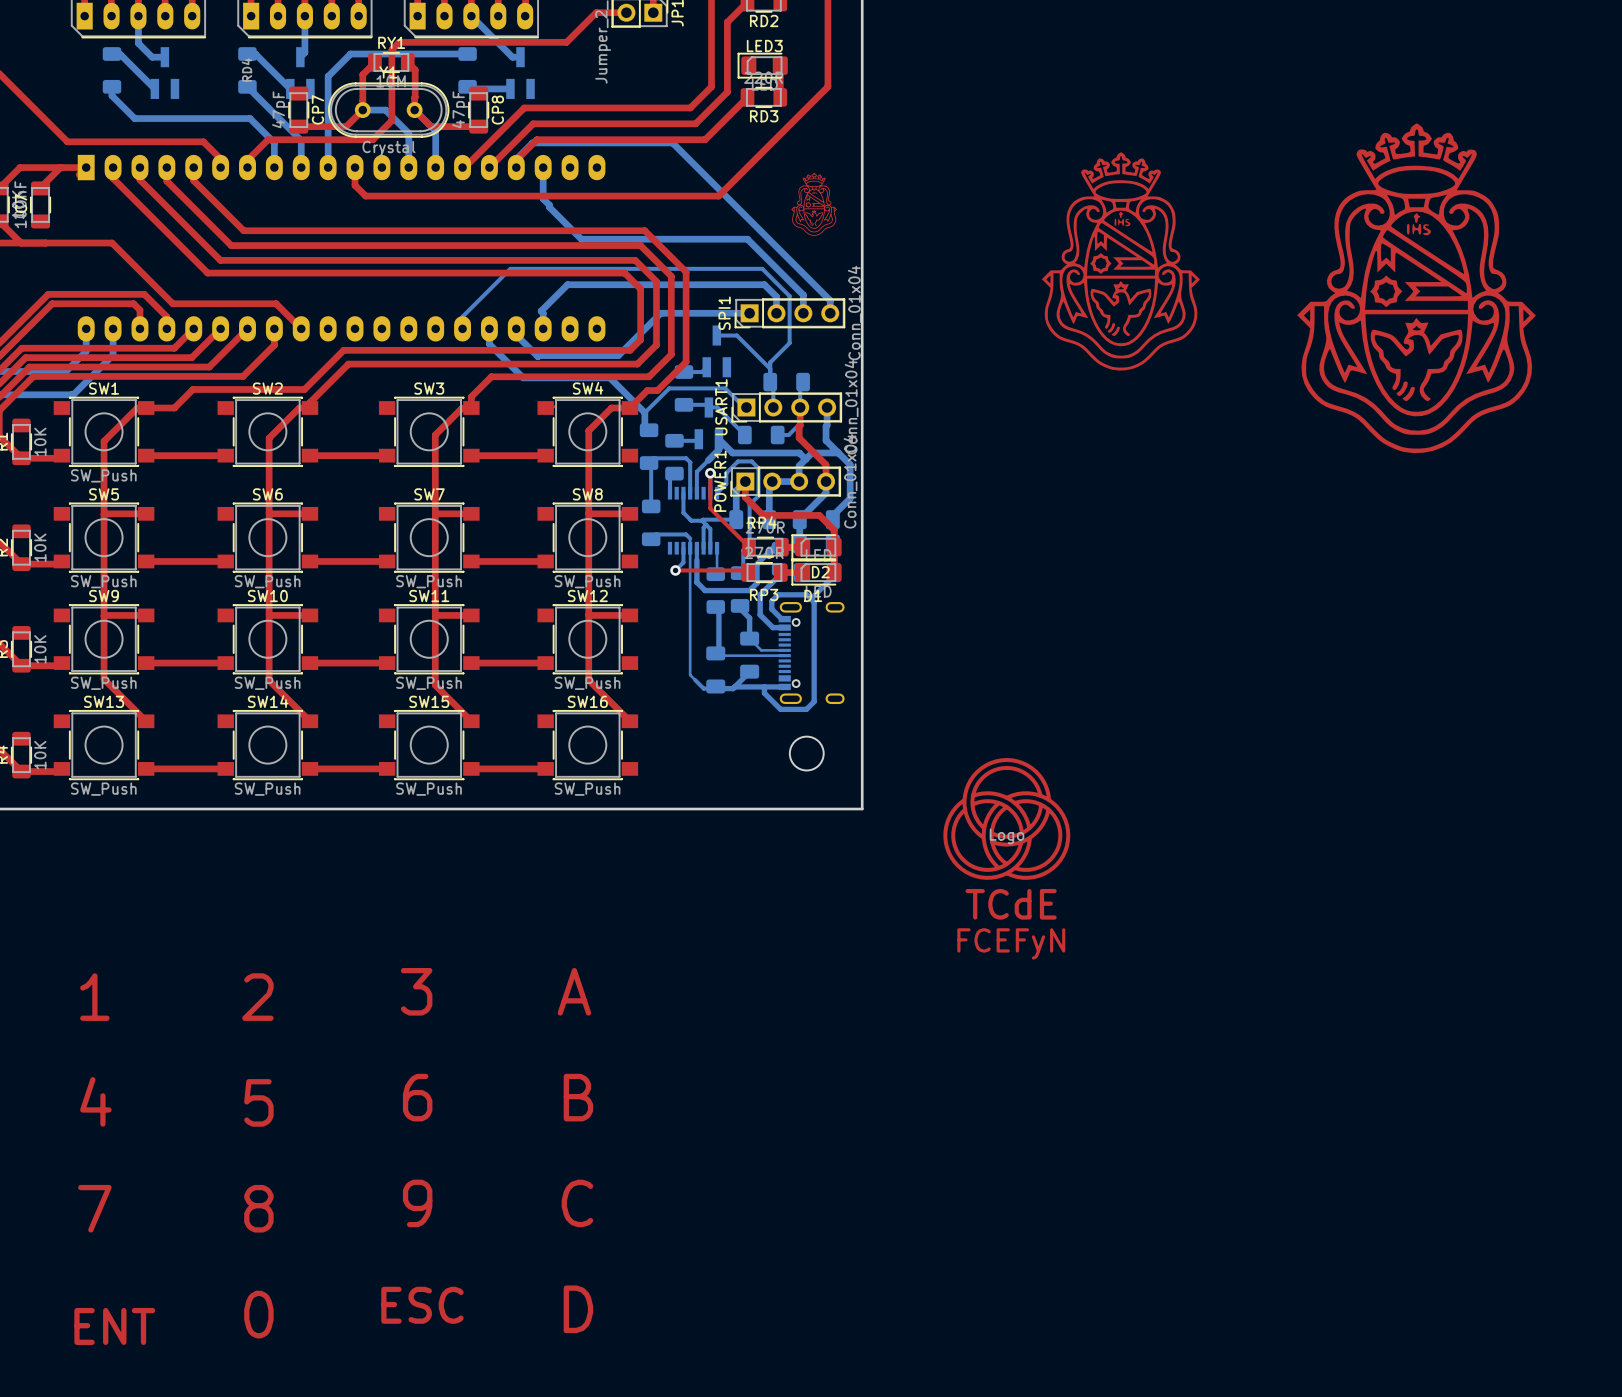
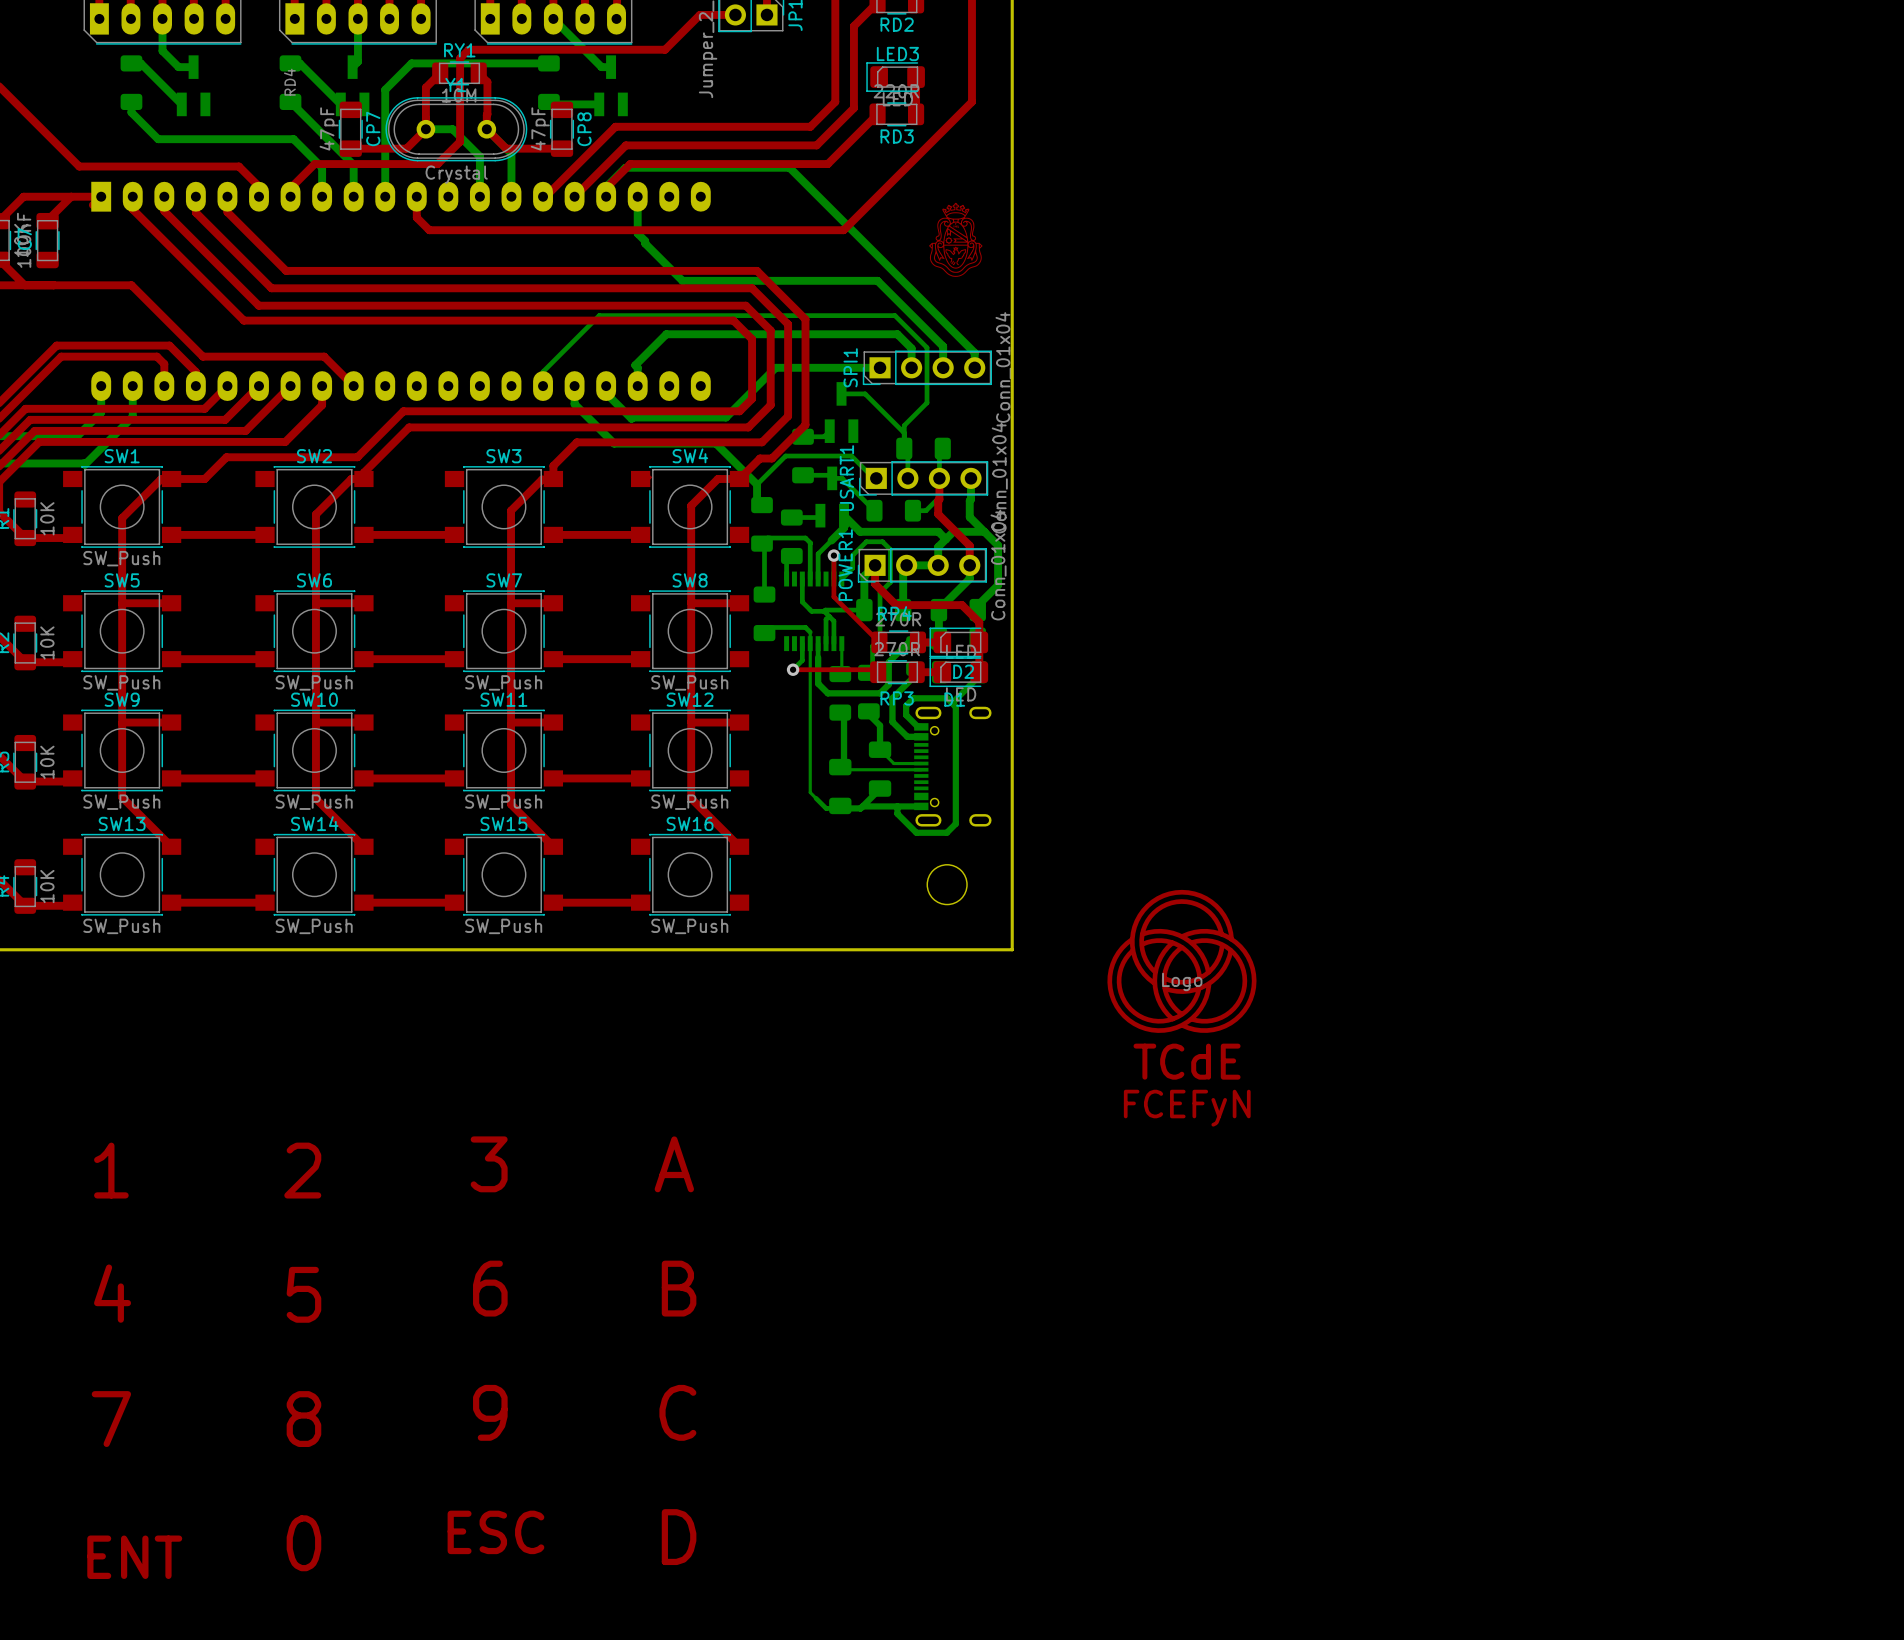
drawing: [1297, 123, 1536, 454] -> none
drawing: [1041, 152, 1201, 371] -> none

